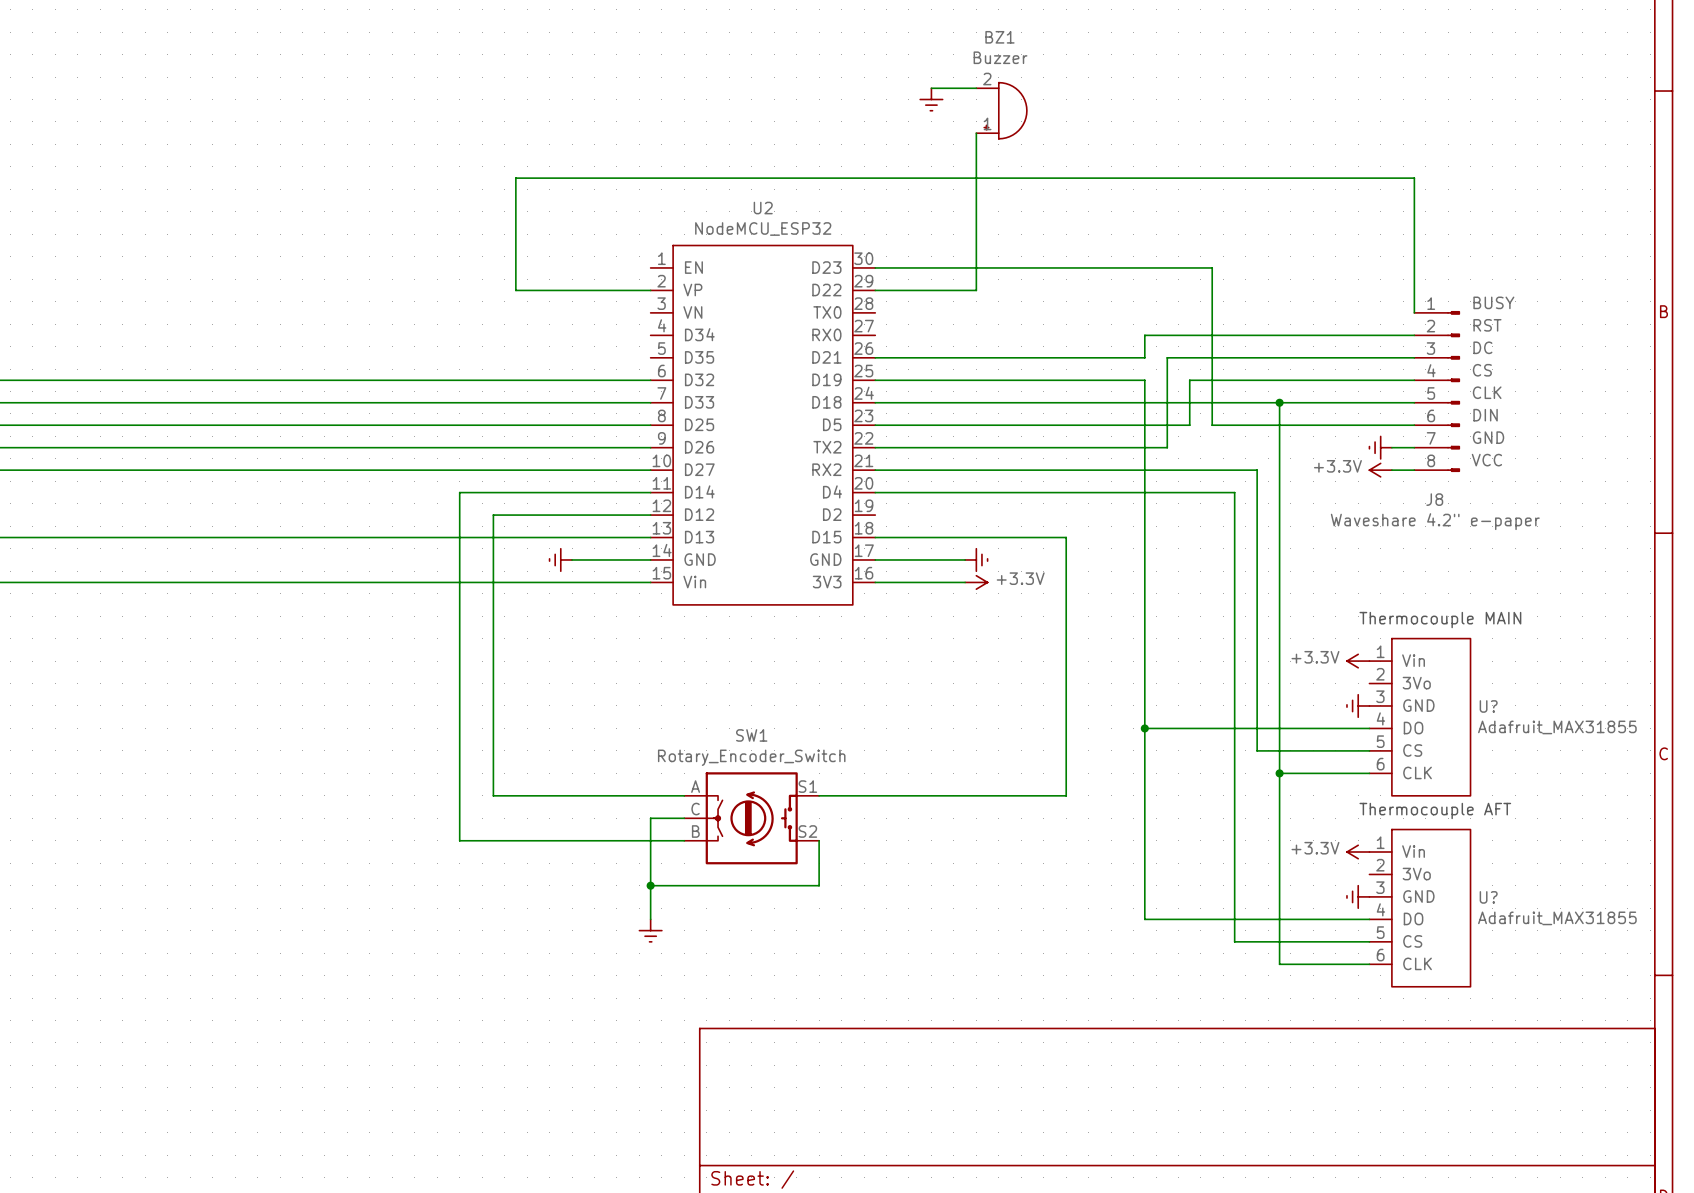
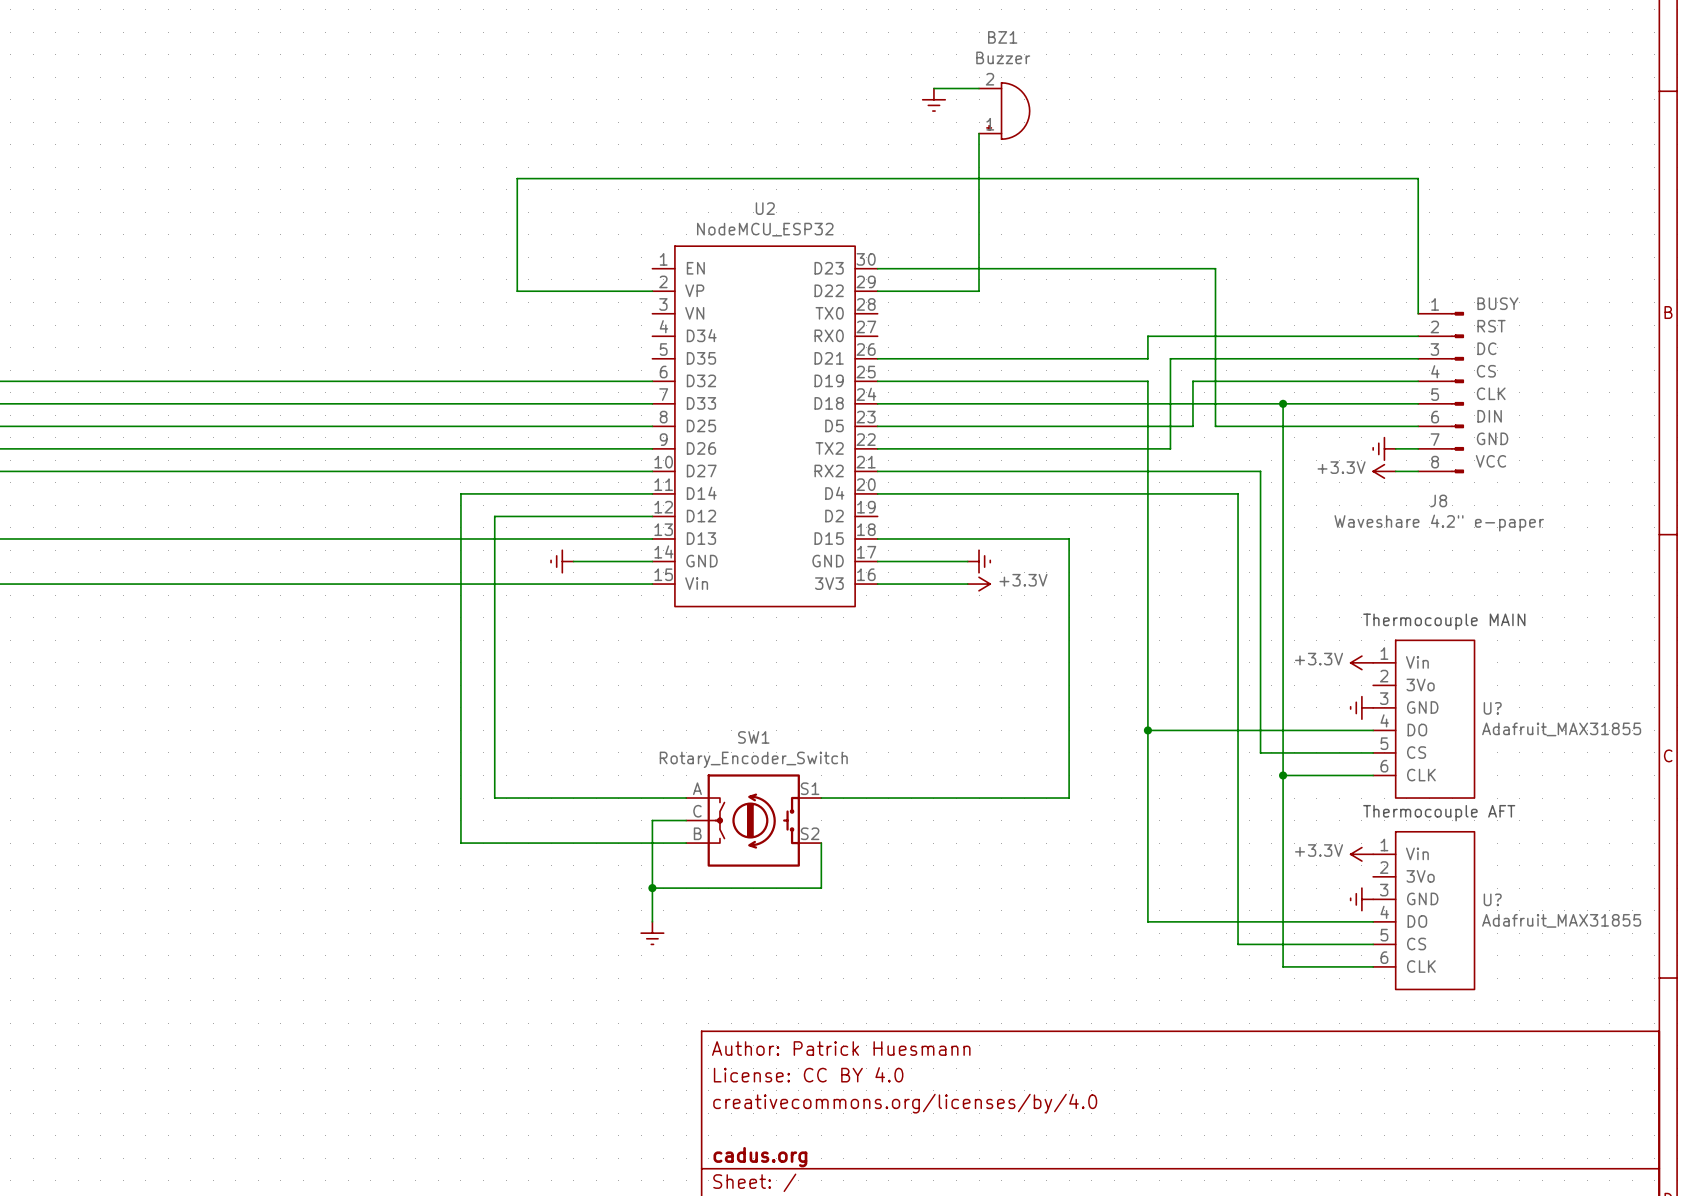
title block: none -> Author: Patrick Huesmann (841, 1048)
title block: none -> License: CC BY 4.0 (808, 1074)
title block: none -> creativecommons.org/licenses/by/4.0 (905, 1103)
title block: none -> cadus.org (760, 1157)

